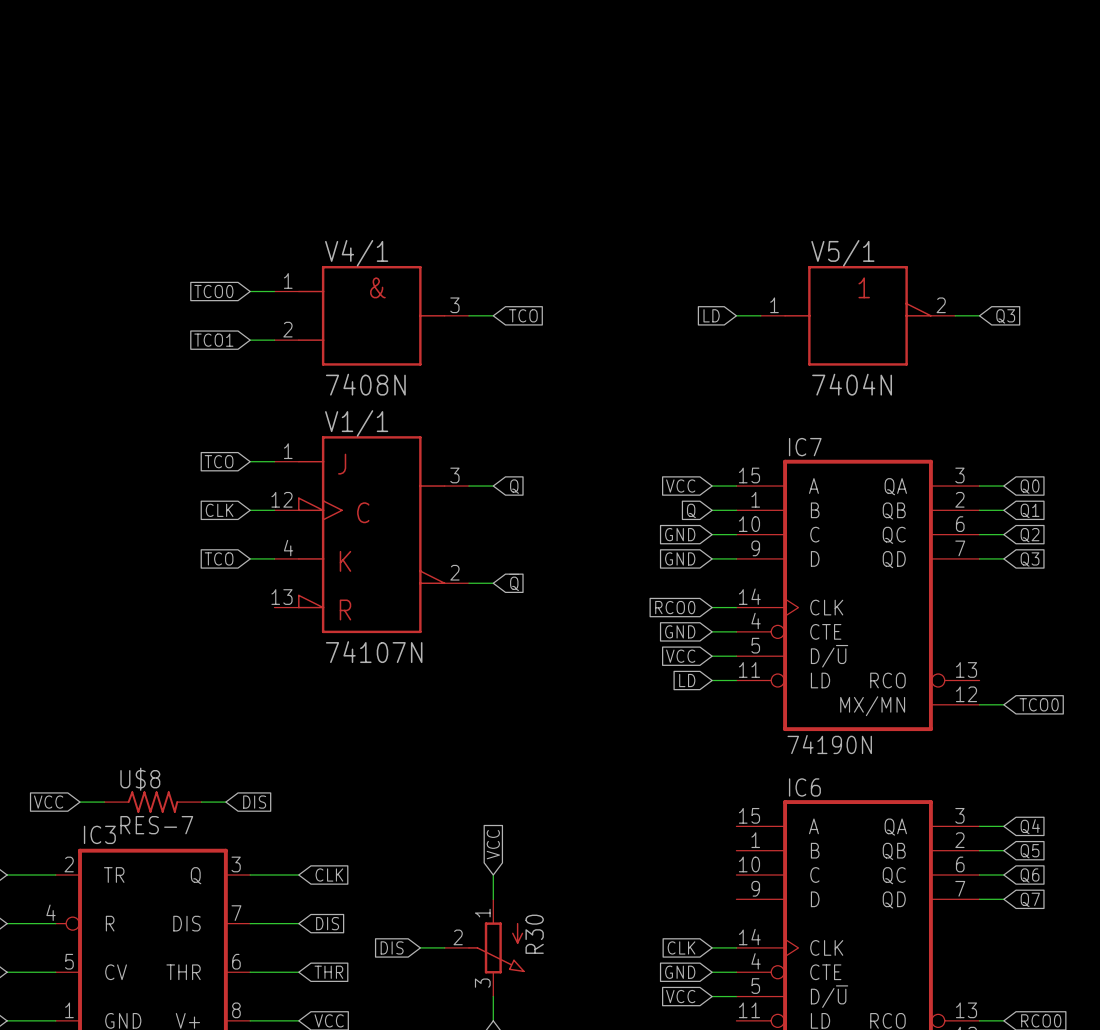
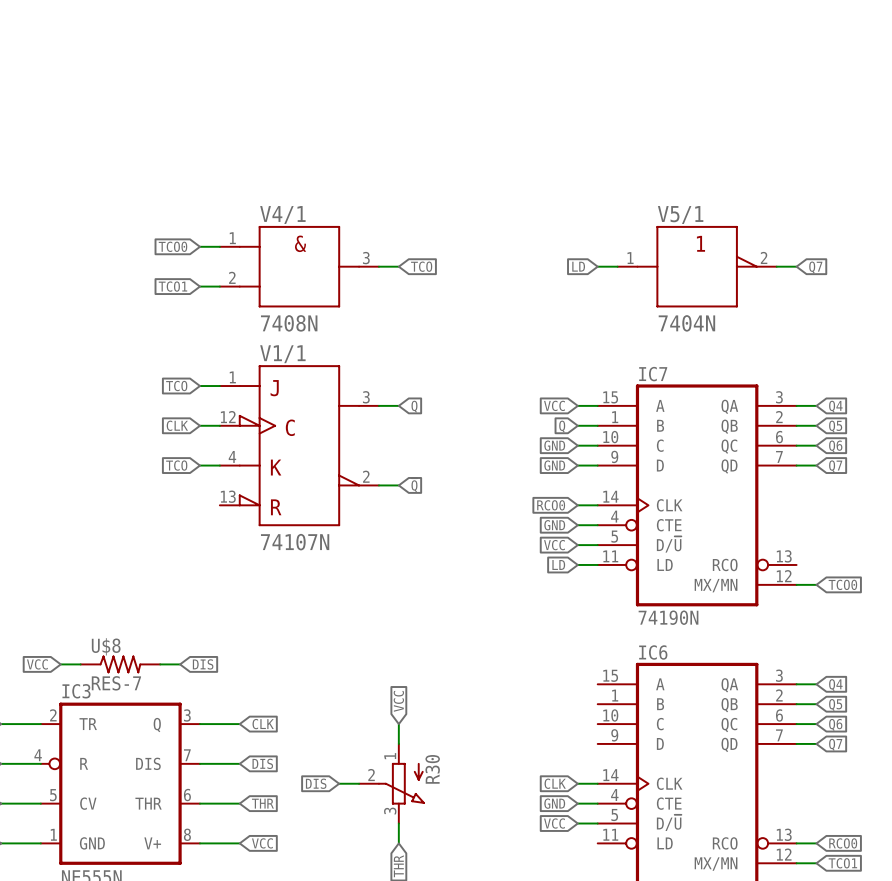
global label: Q3 (1005, 316) -> Q7 (815, 267)
global label: Q0 (1030, 486) -> Q4 (835, 406)
global label: Q1 (1030, 510) -> Q5 (835, 426)
global label: Q2 (1030, 535) -> Q6 (835, 446)
global label: Q3 (1030, 559) -> Q7 (835, 466)

